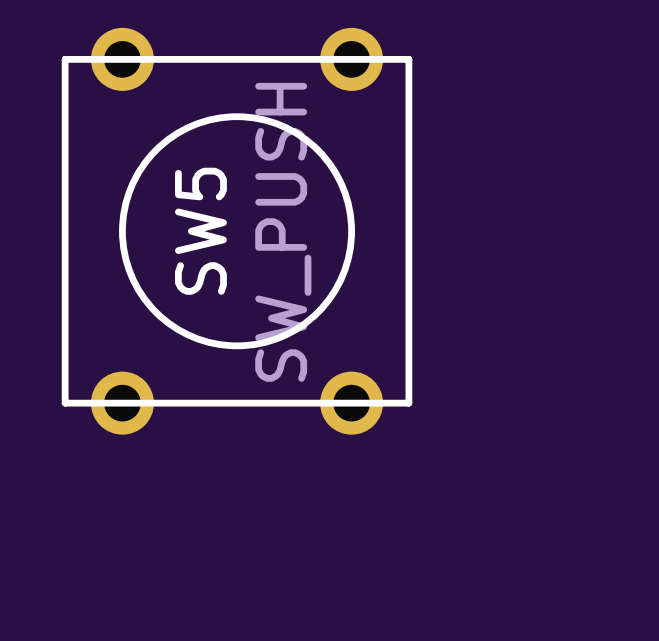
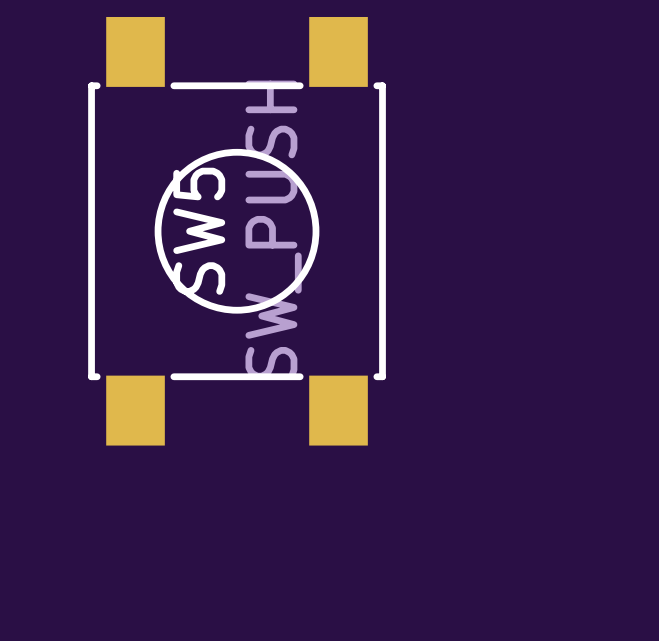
SW5 footprint: [61, 27, 413, 435] -> [88, 16, 386, 446]

